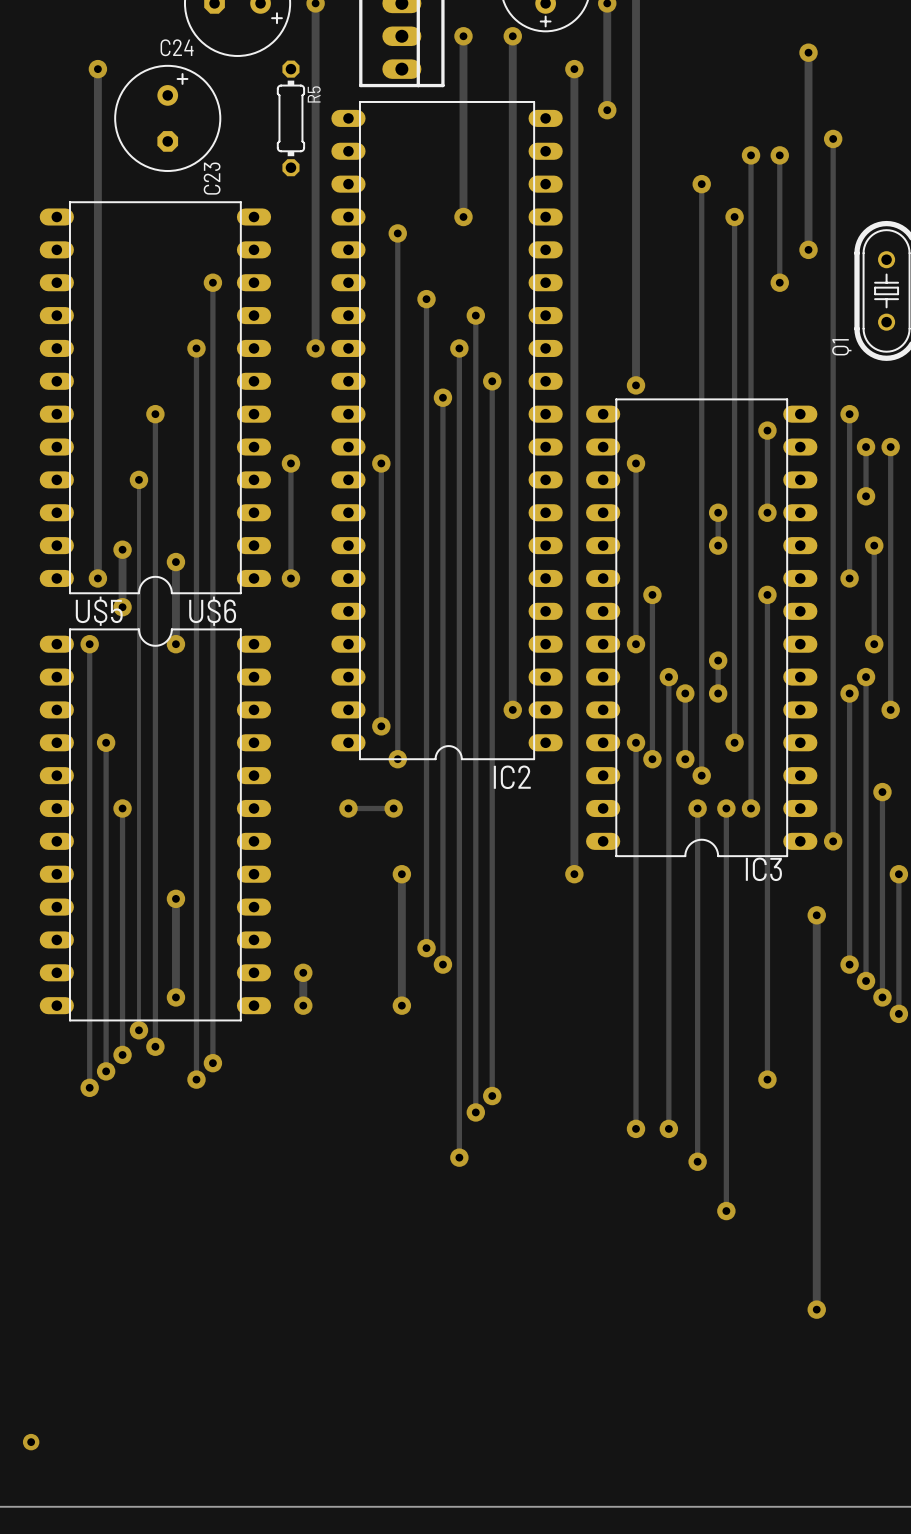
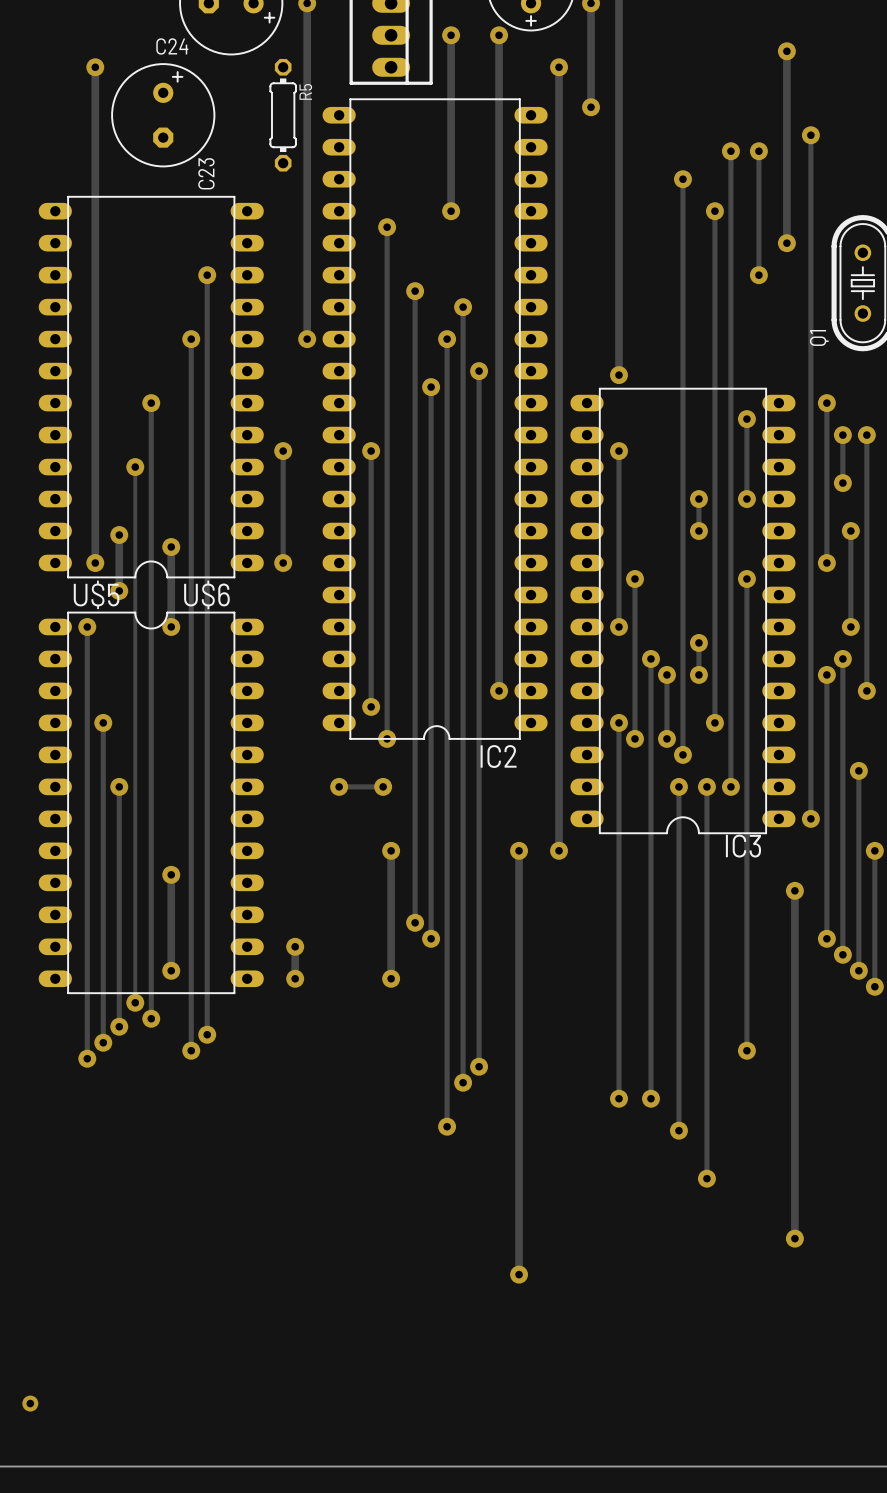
track: none -> (519, 850) (519, 1274)
via: none -> (519, 850)
track: (816, 1272) (816, 1309) -> none
via: none -> (519, 1274)
via position: (816, 1309) -> (794, 1238)

